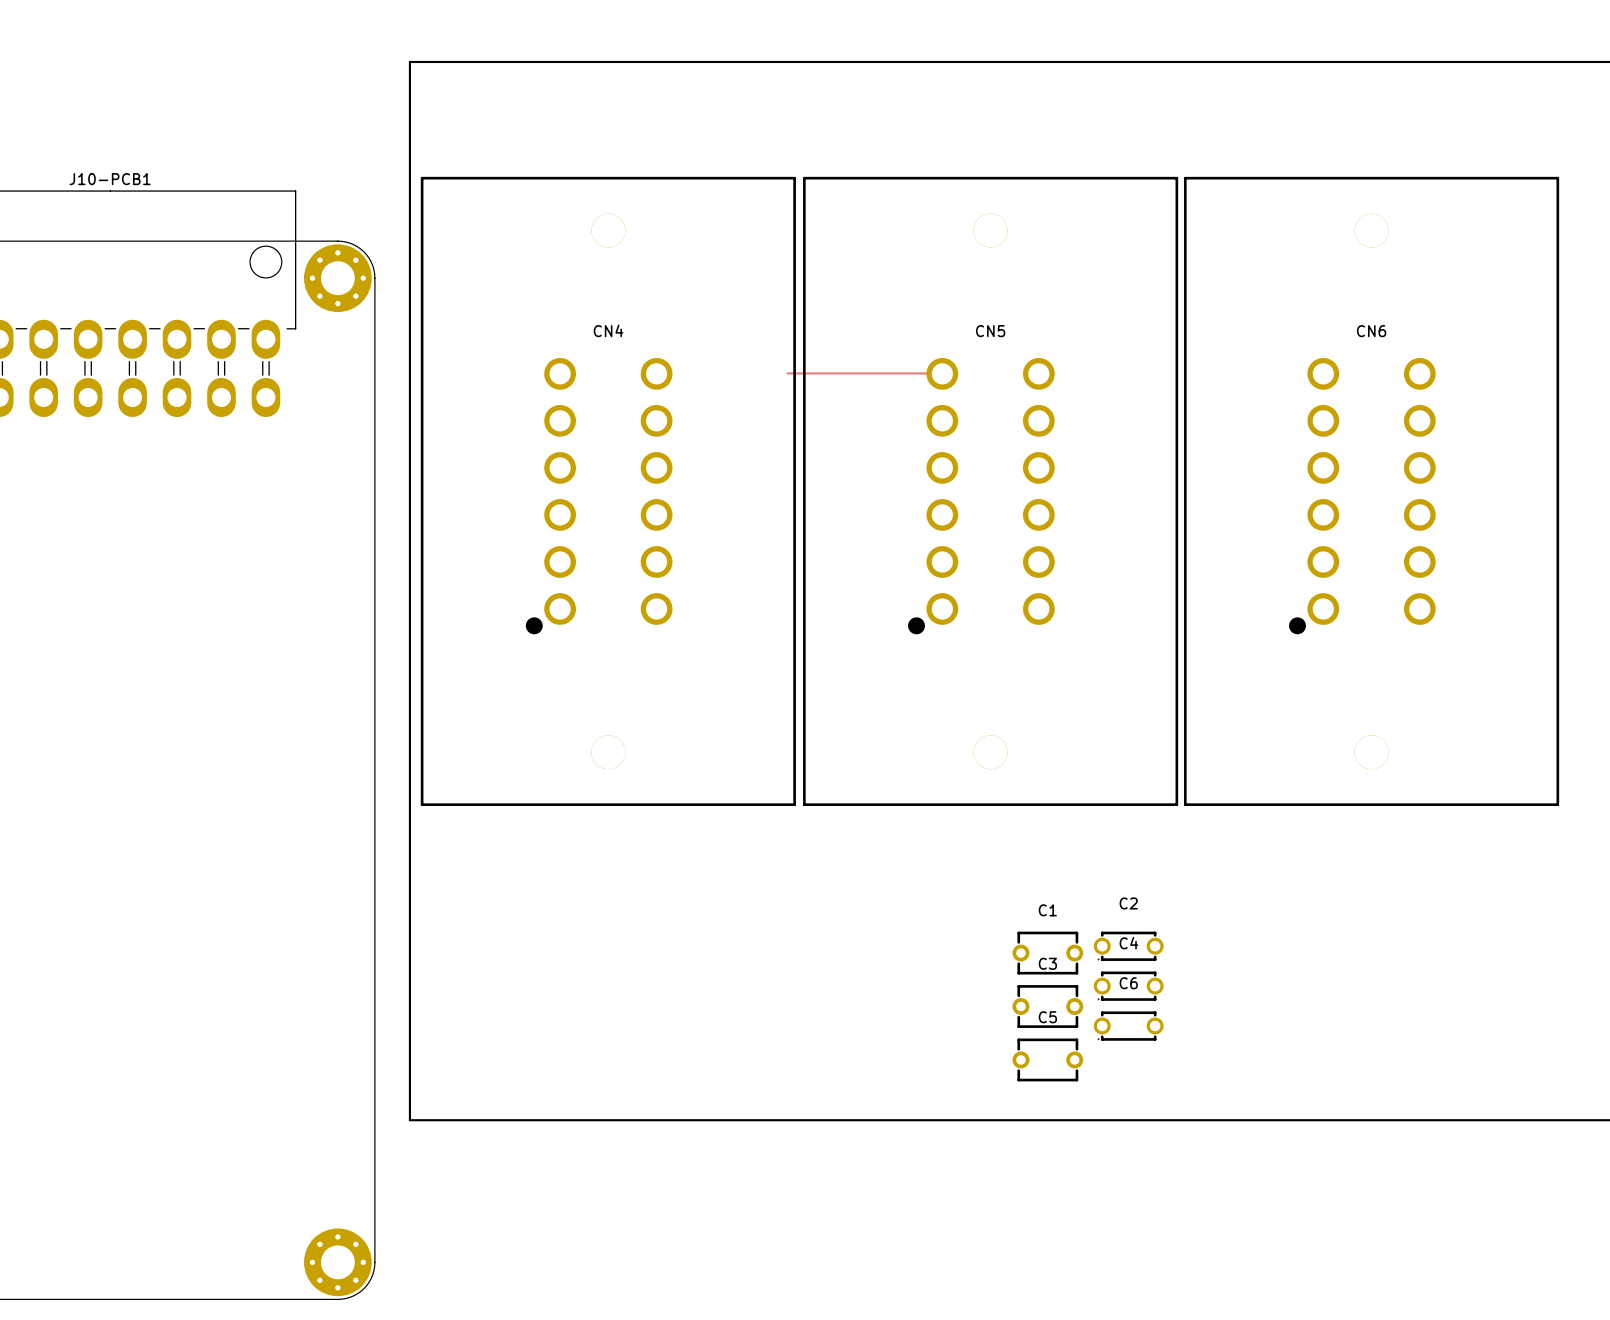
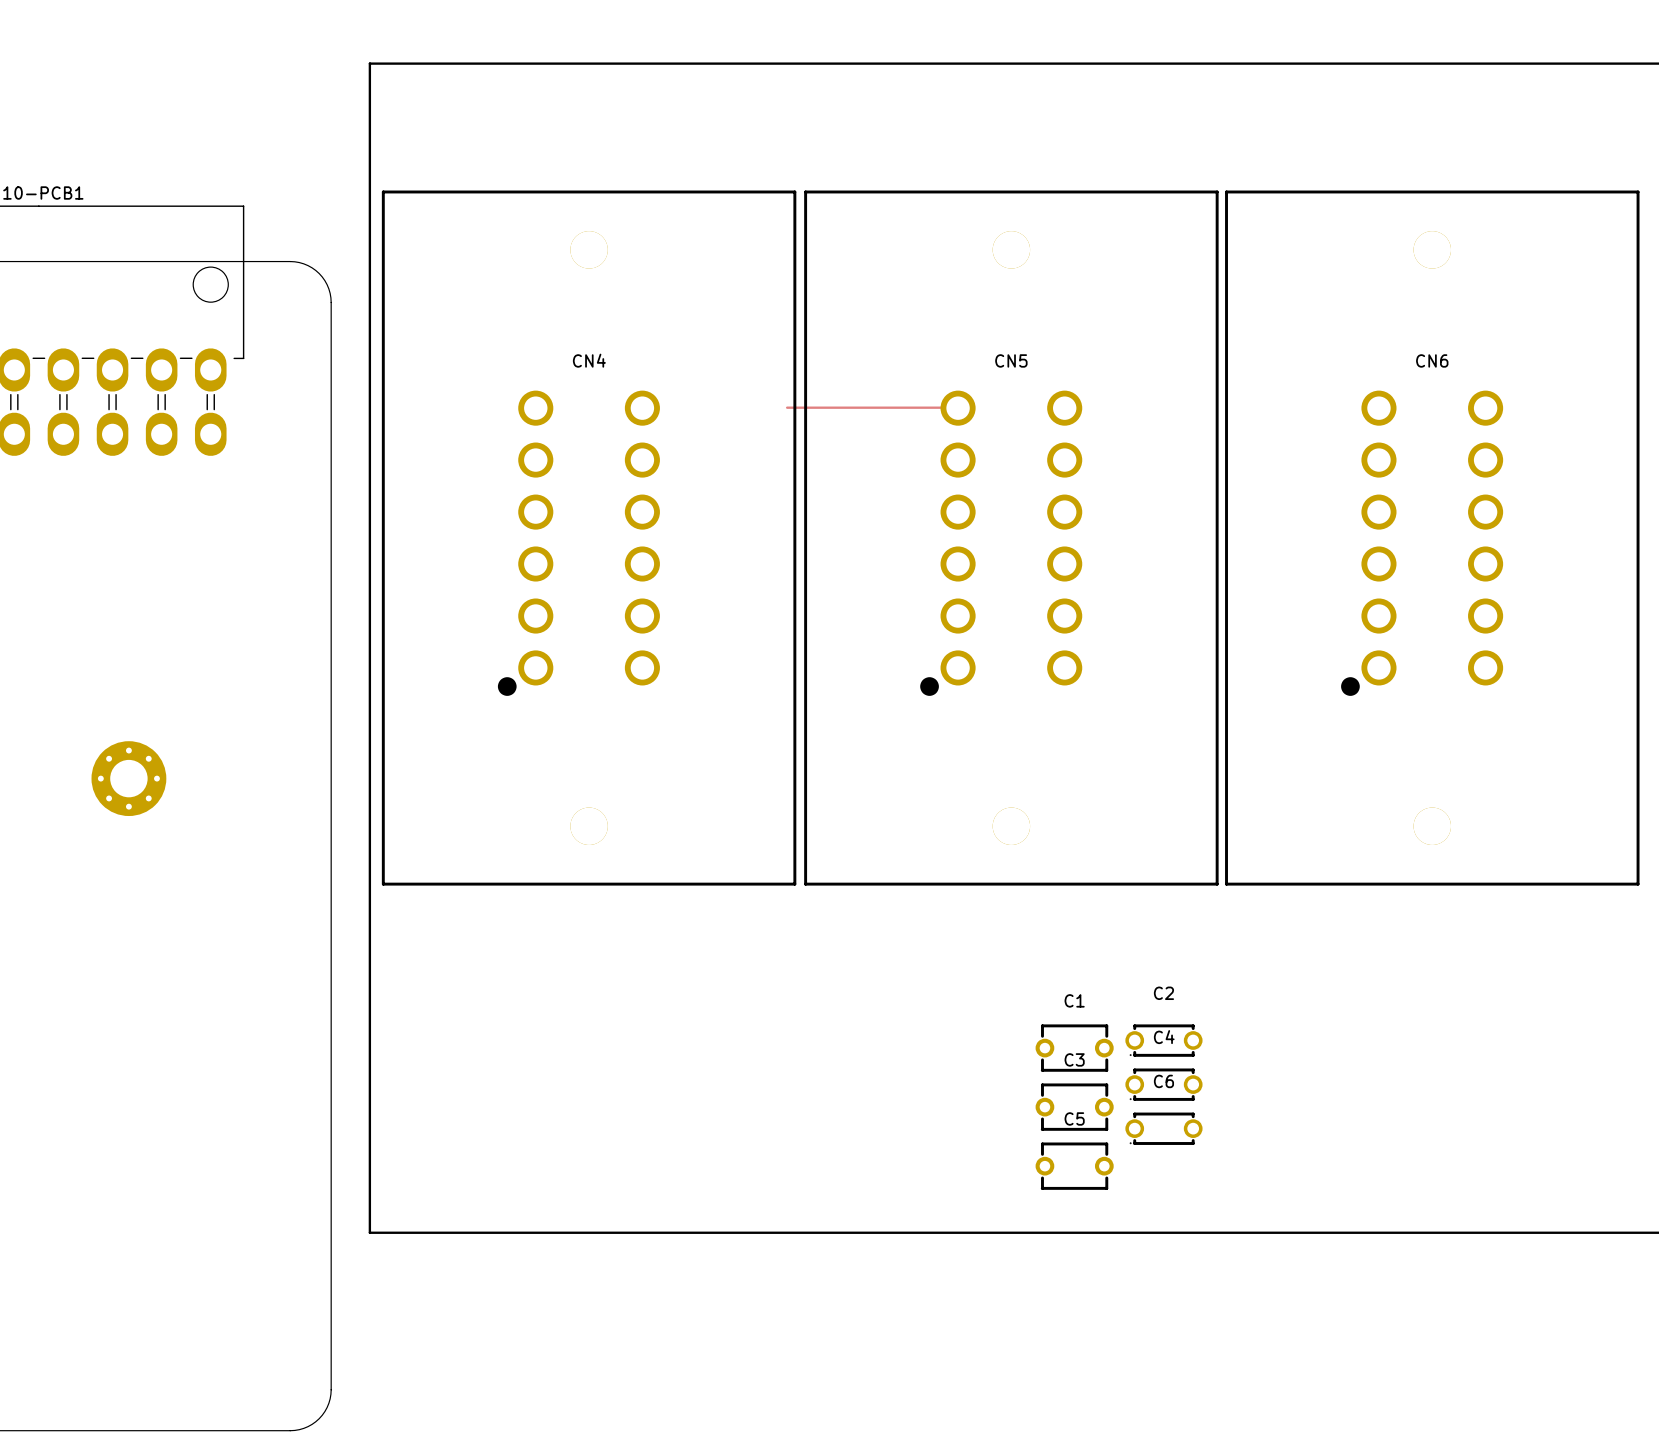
part: (337, 278) -> none
part: none -> (128, 778)
part: (337, 1262) -> none

